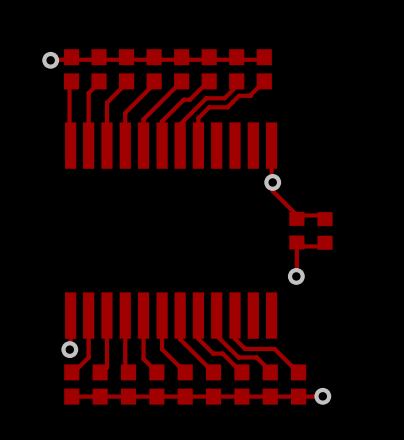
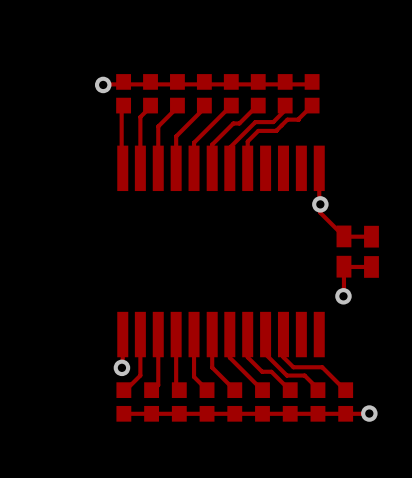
part footprint: [289, 211, 305, 250] -> [336, 225, 352, 278]
part footprint: [317, 212, 333, 250] -> [364, 225, 379, 278]

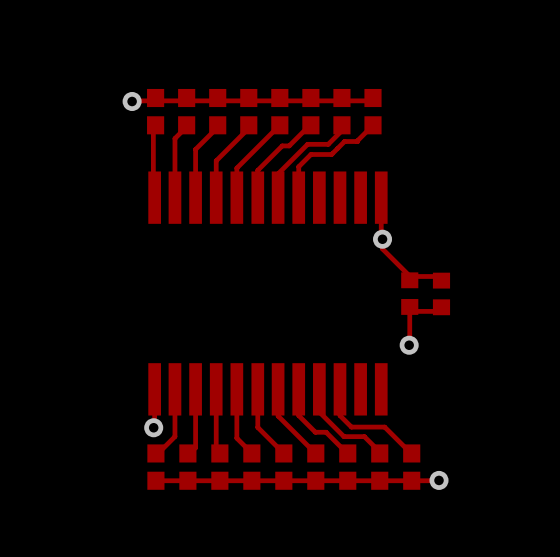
part footprint: [336, 225, 352, 278] -> [401, 272, 419, 315]
part footprint: [364, 225, 379, 278] -> [432, 272, 451, 316]

